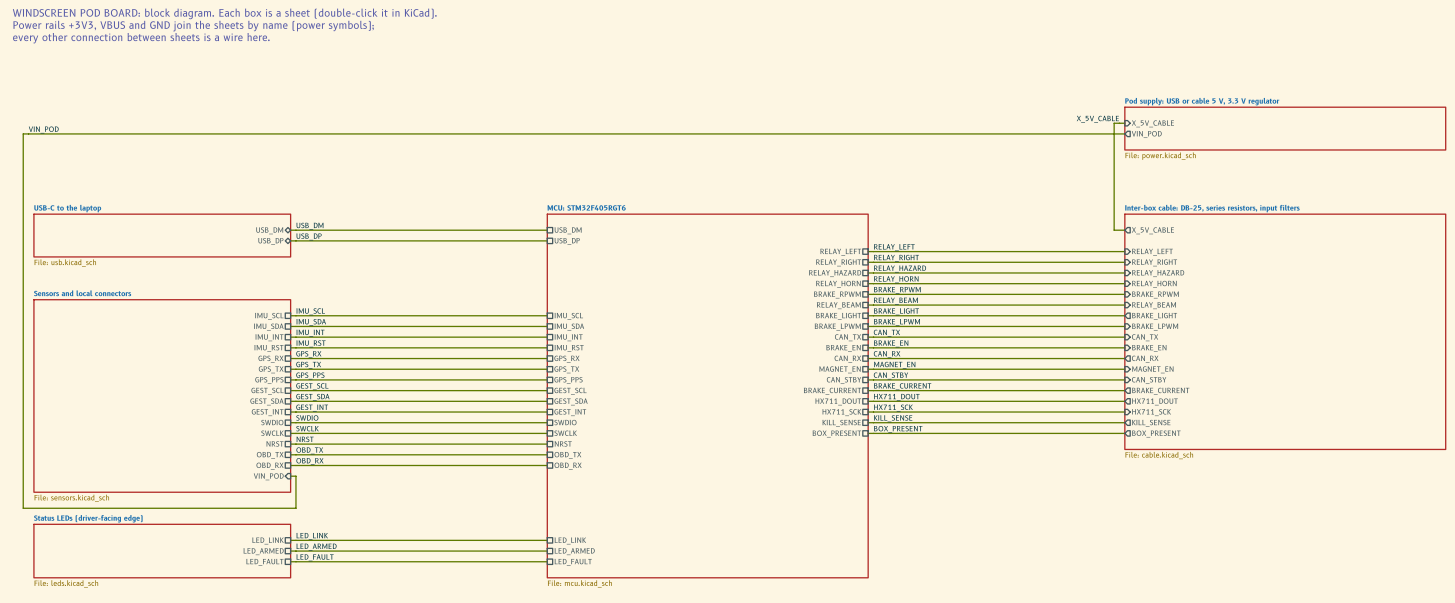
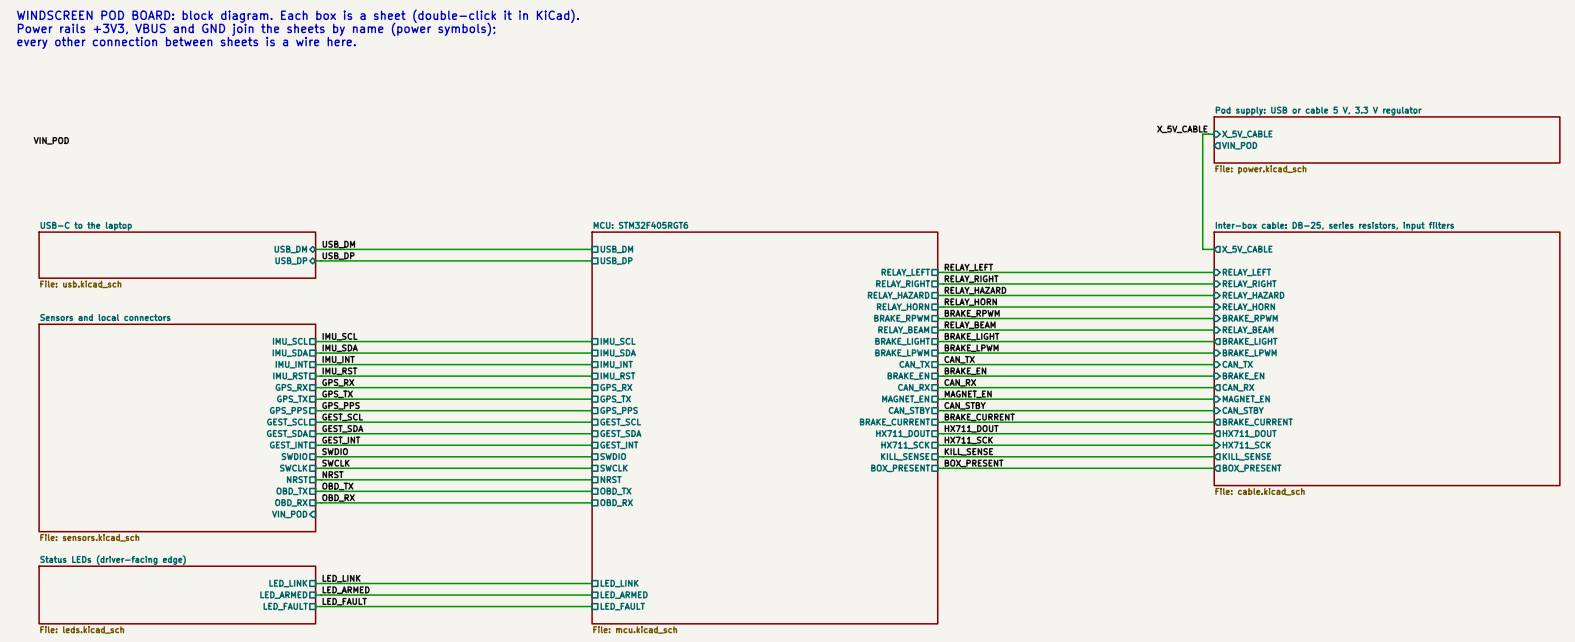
wire: (1124, 133) (23, 133) (23, 508) (295, 508) (295, 476) (290, 476) -> none

